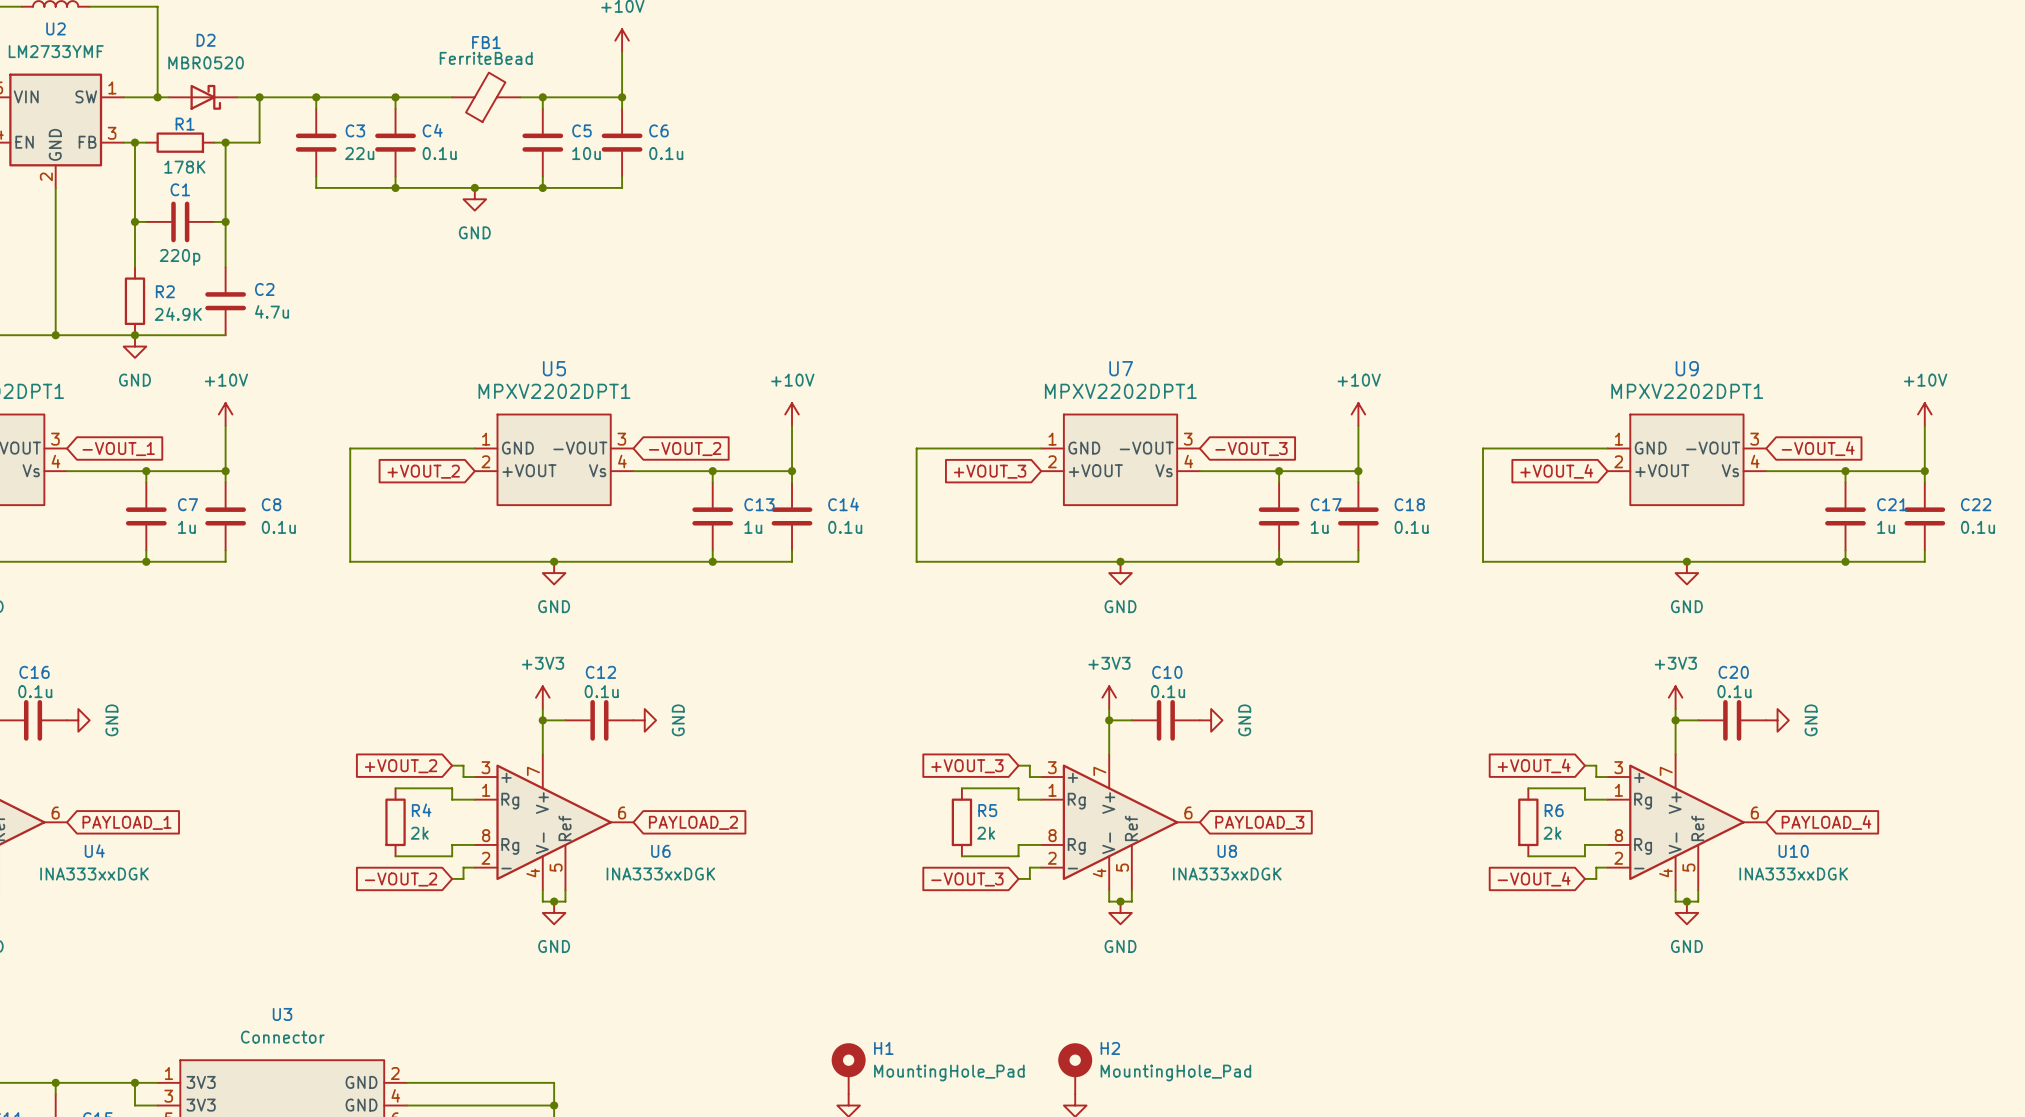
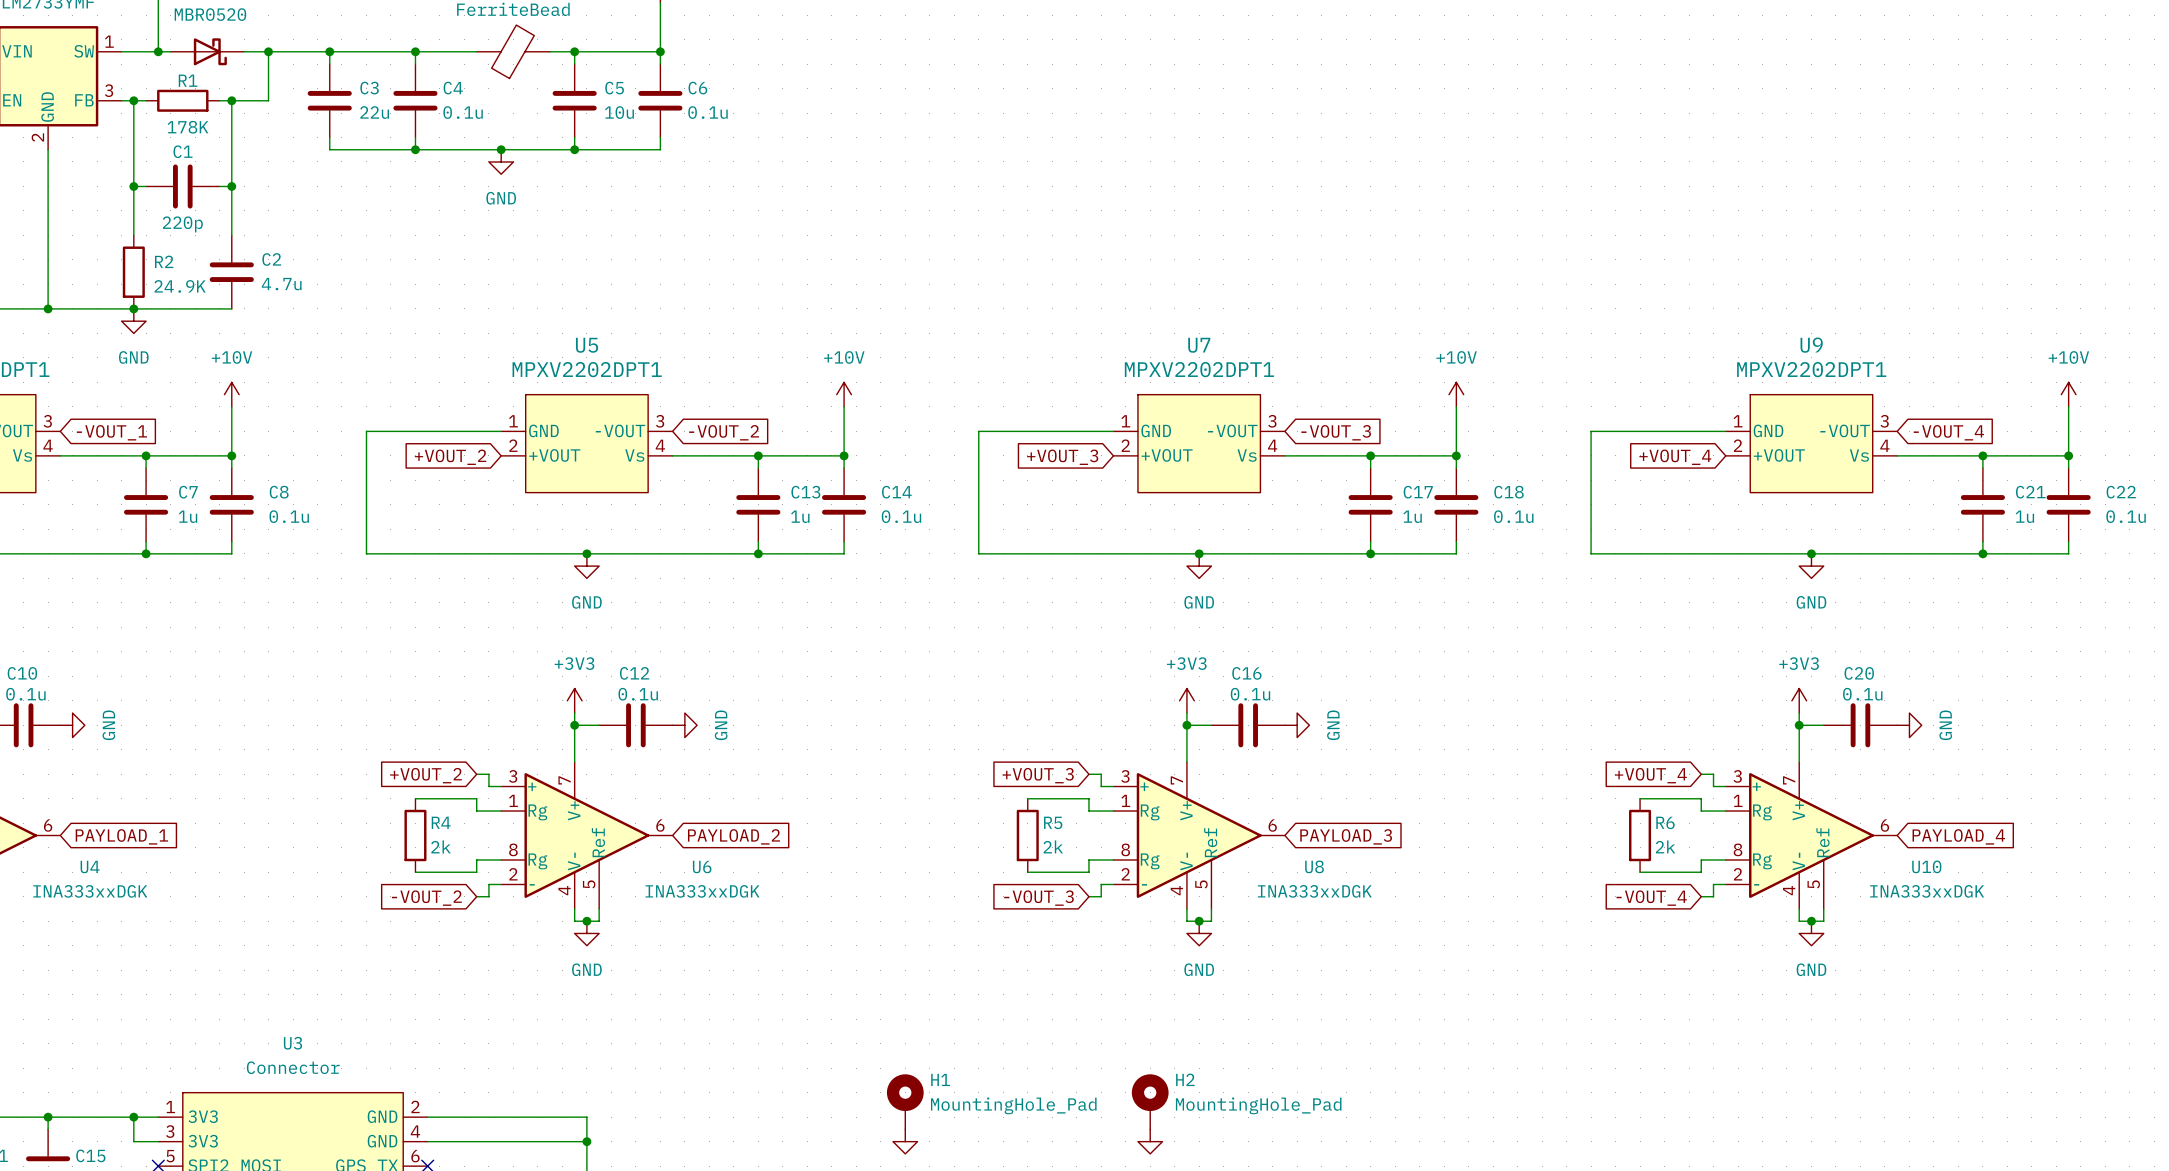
C16 name: C16 (34, 672) -> C10 (22, 673)
C10 name: C10 (1167, 672) -> C16 (1246, 673)

